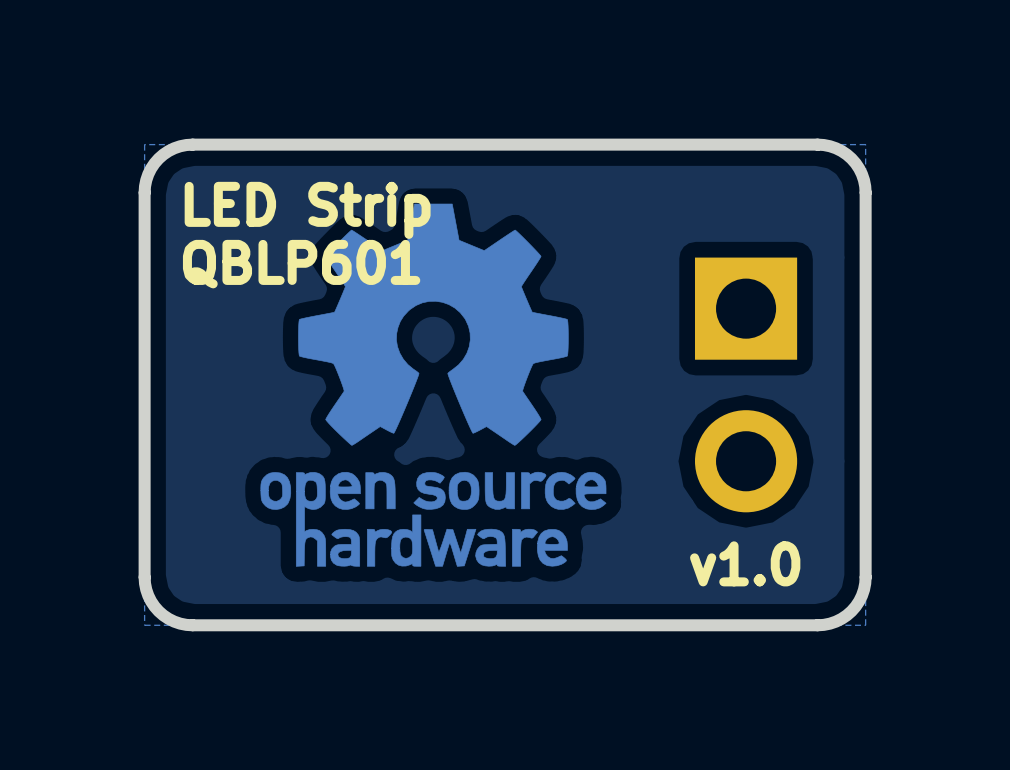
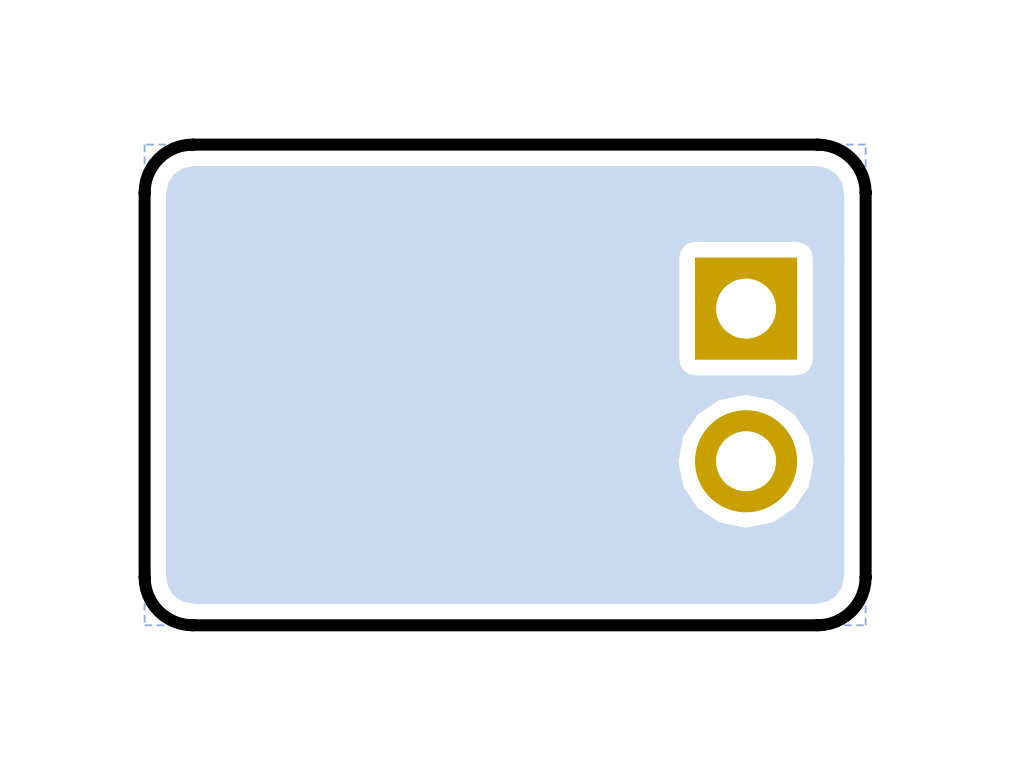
drawing: [260, 203, 607, 567] -> none
text: LED Strip (307, 210) -> none
text: QBLP601 (301, 264) -> none
text: v1.0 (745, 563) -> none

